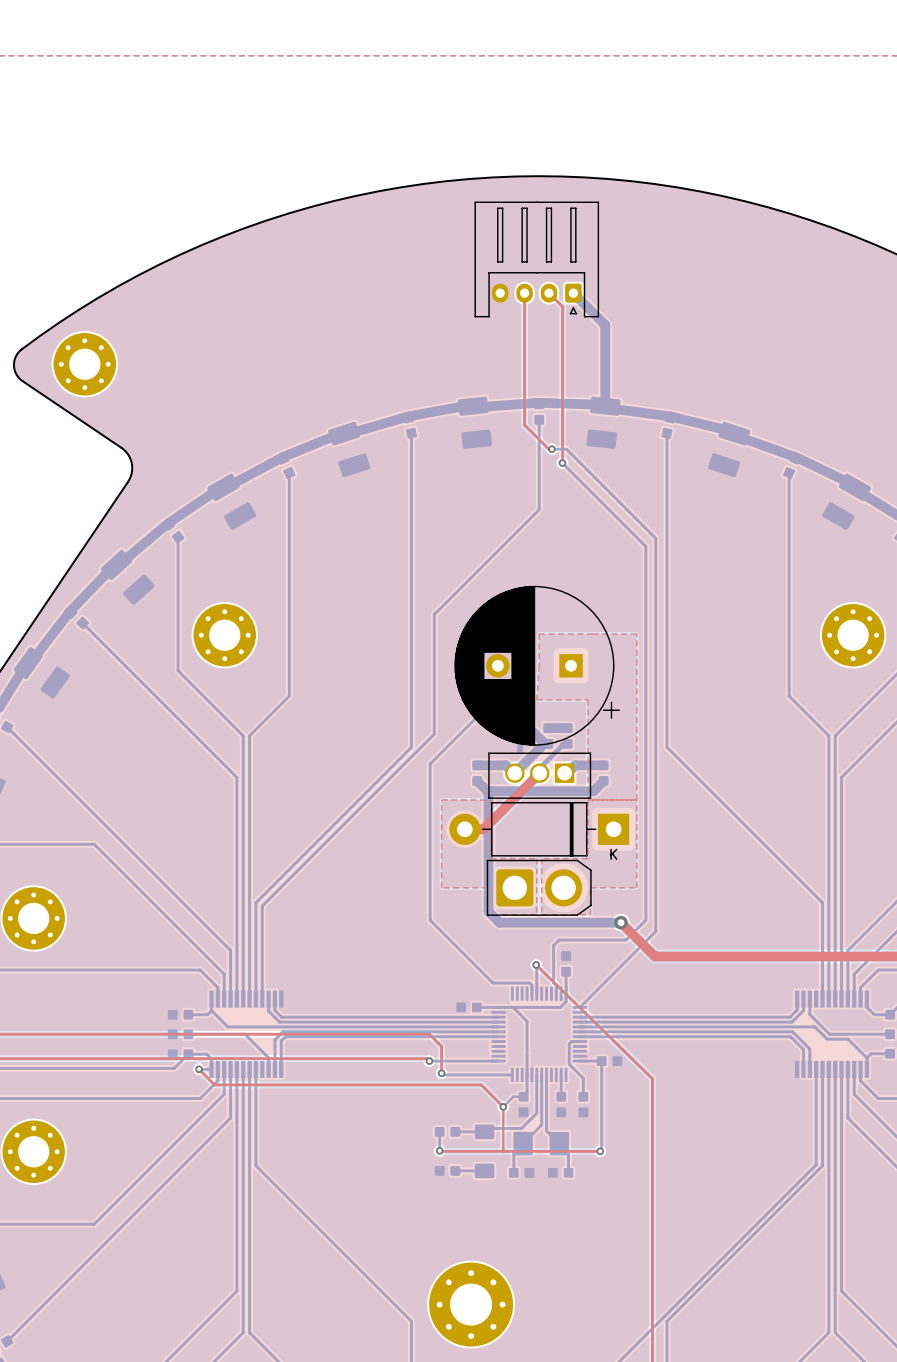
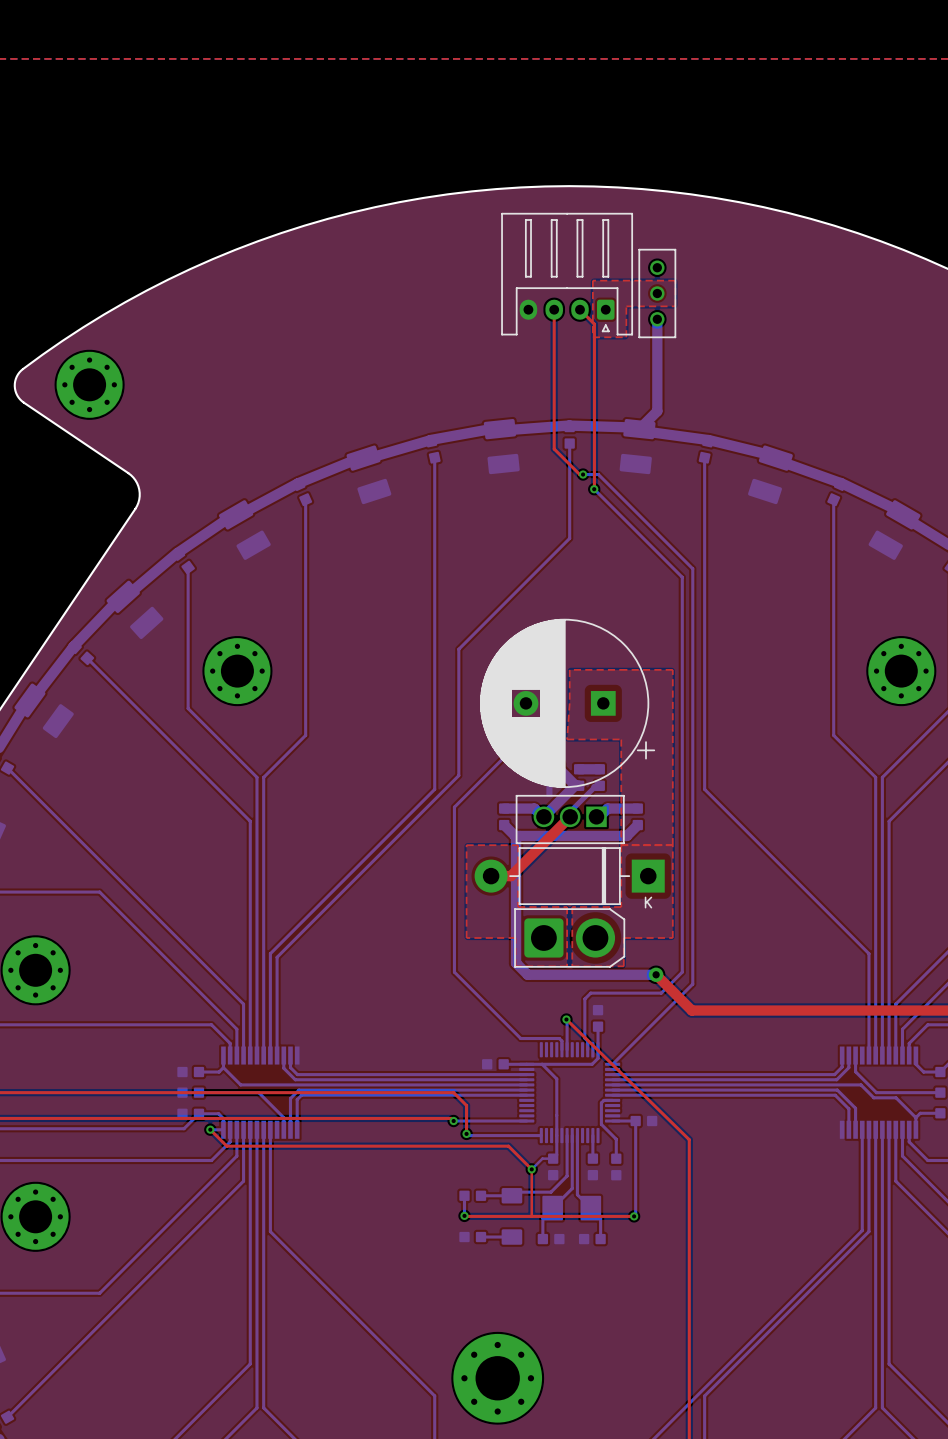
top zone outline: none -> (592, 280) (675, 280) (675, 306) (626, 306) (626, 337) (592, 337) (592, 280)
part: none -> (657, 293)
bottom track: (573, 293) (605, 325) (605, 406) -> (657, 319) (657, 411) (639, 429)

